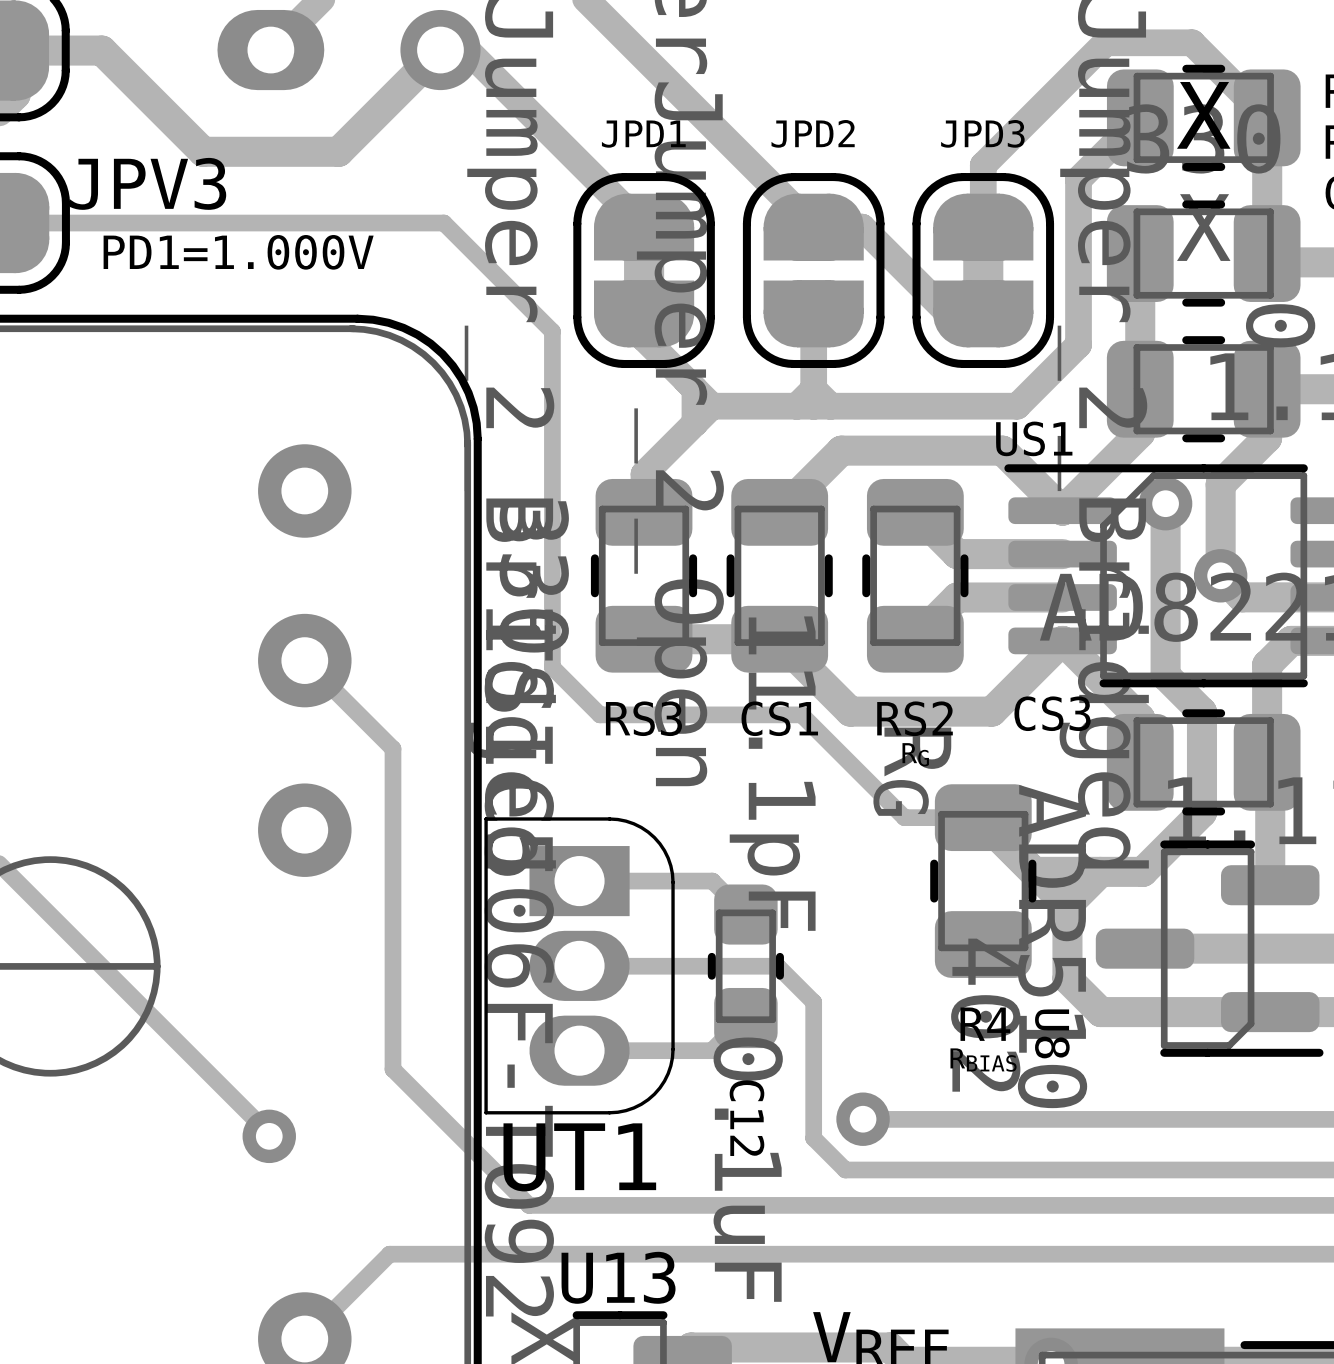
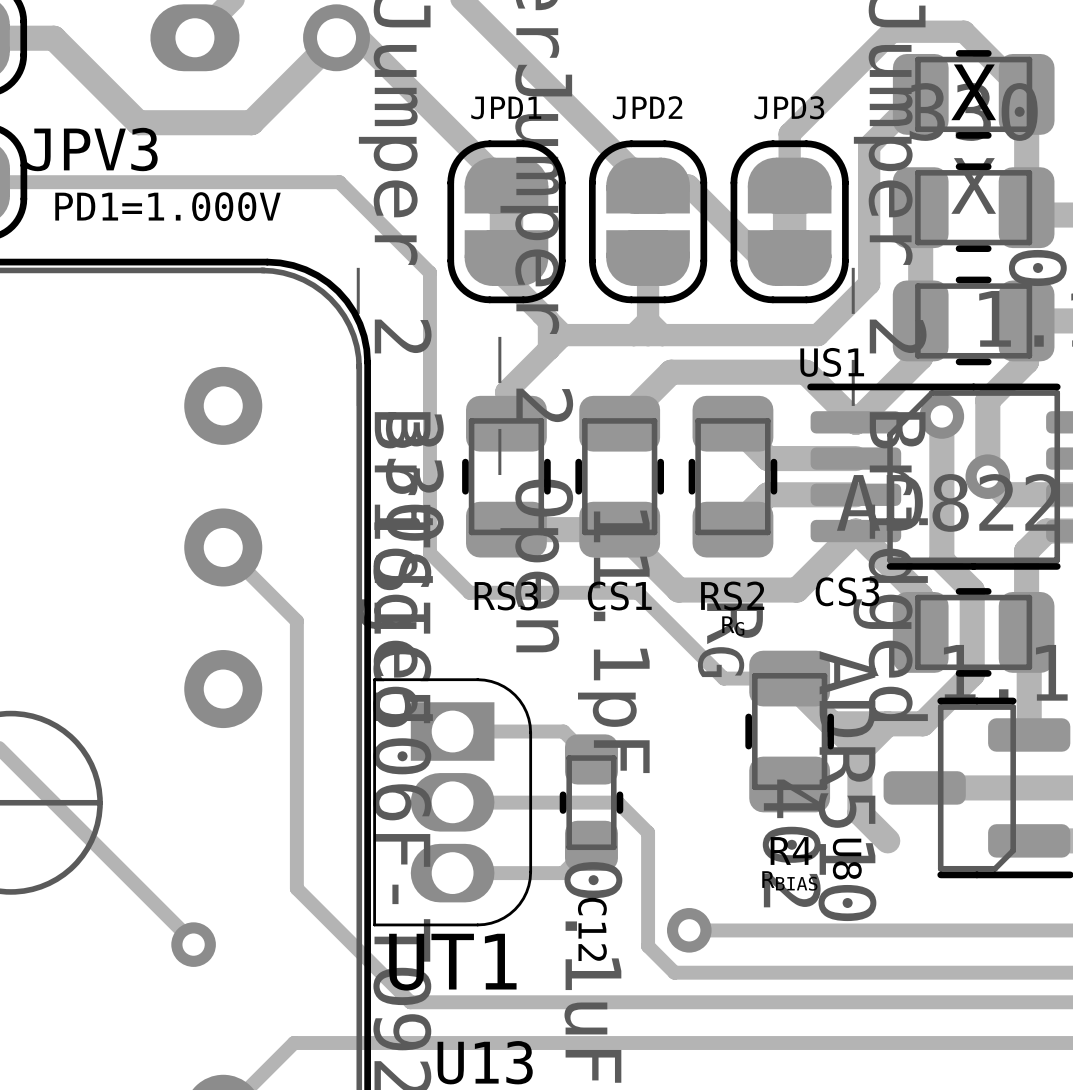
track: (1270, 1012) (1100, 1012) -> none

